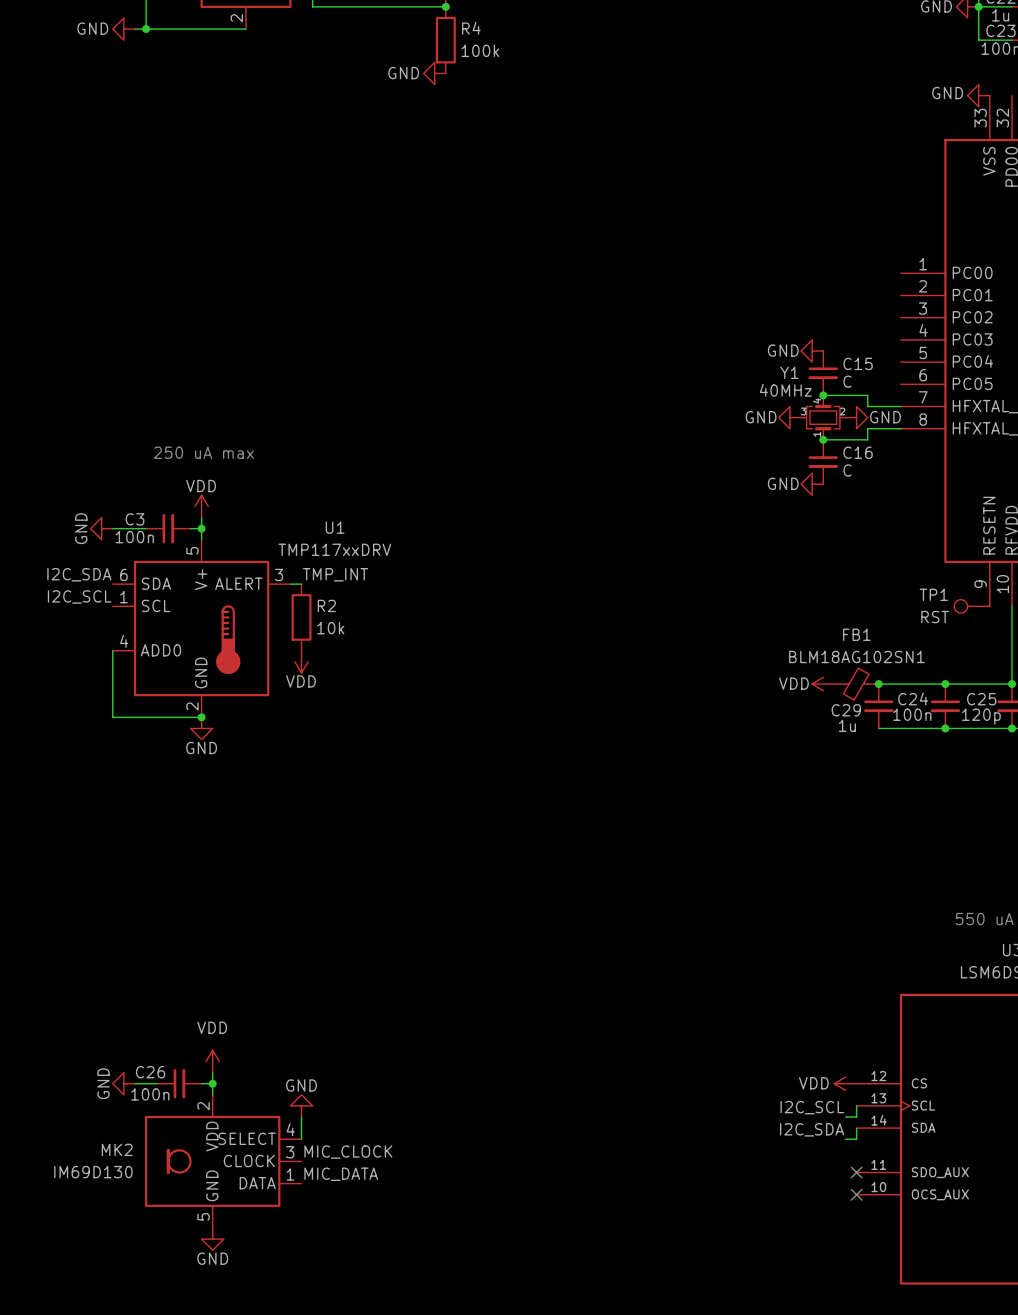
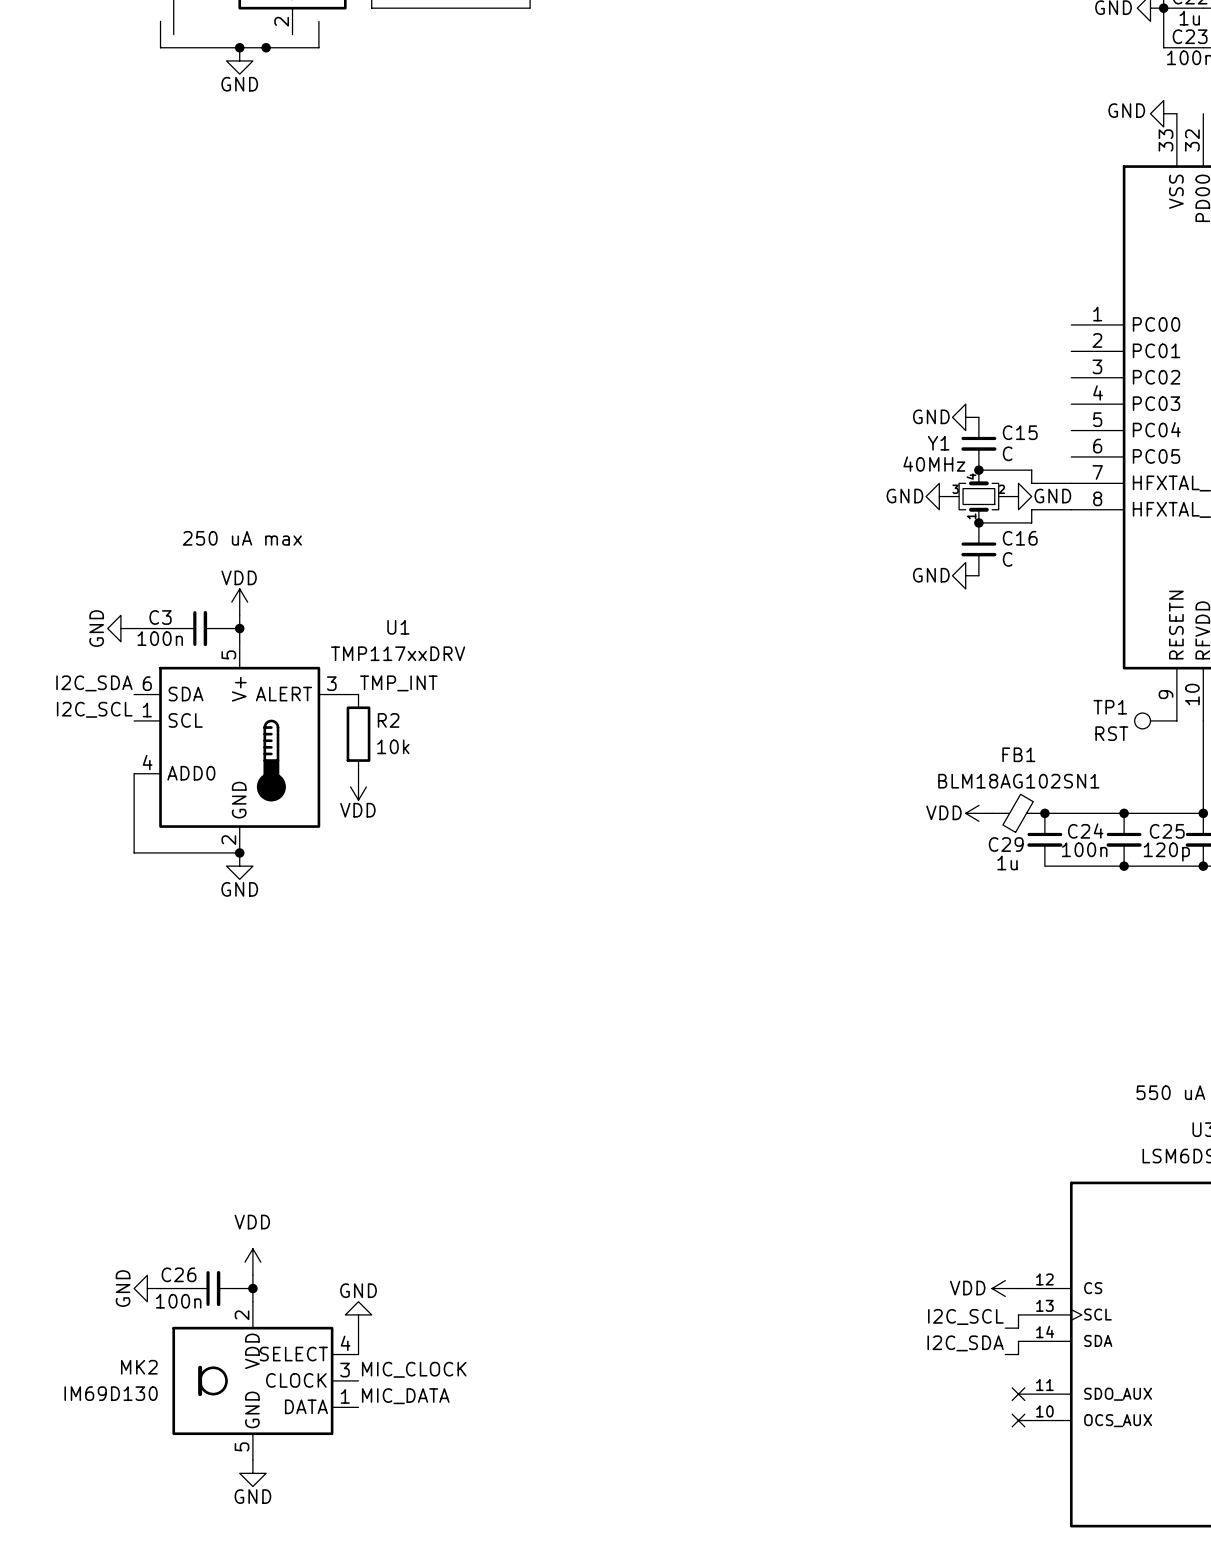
junction: (445, 6) -> none
wire: none -> (160, 21) (160, 47) (318, 47) (318, 21)
power symbol rotation: 0° (123, 29) -> 90° counterclockwise (239, 60)
power symbol position: GND (123, 29) -> GND (239, 60)
wire: (135, 29) (246, 29) -> none
junction: (146, 29) -> none
junction: none -> (239, 47)
junction: none -> (266, 47)
R4: 100k (445, 40) -> none
power symbol: GND (434, 73) -> none

